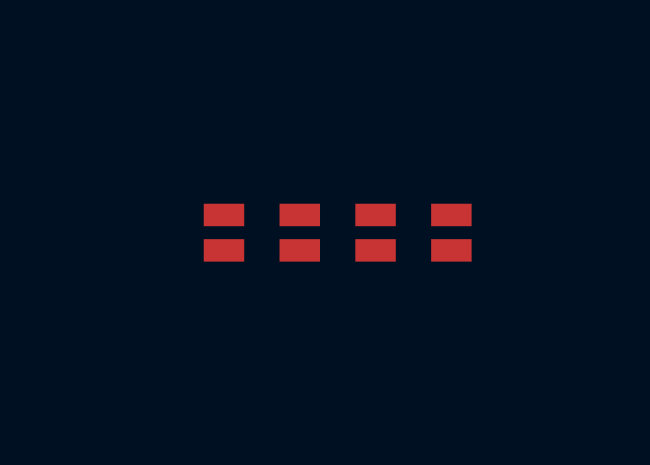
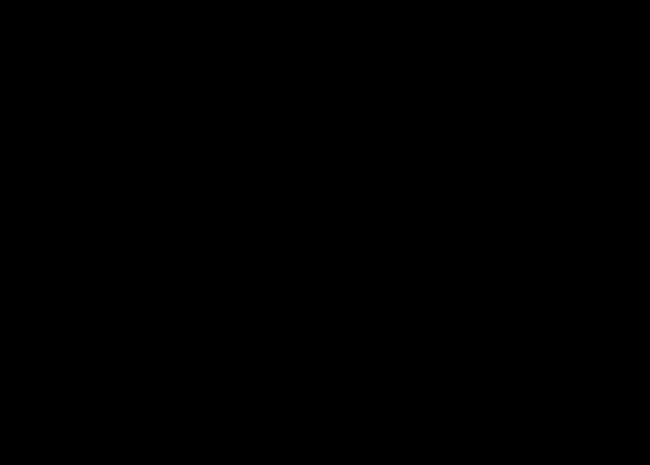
part: (223, 232) -> none
part: (299, 232) -> none
part: (375, 232) -> none
part: (451, 232) -> none

